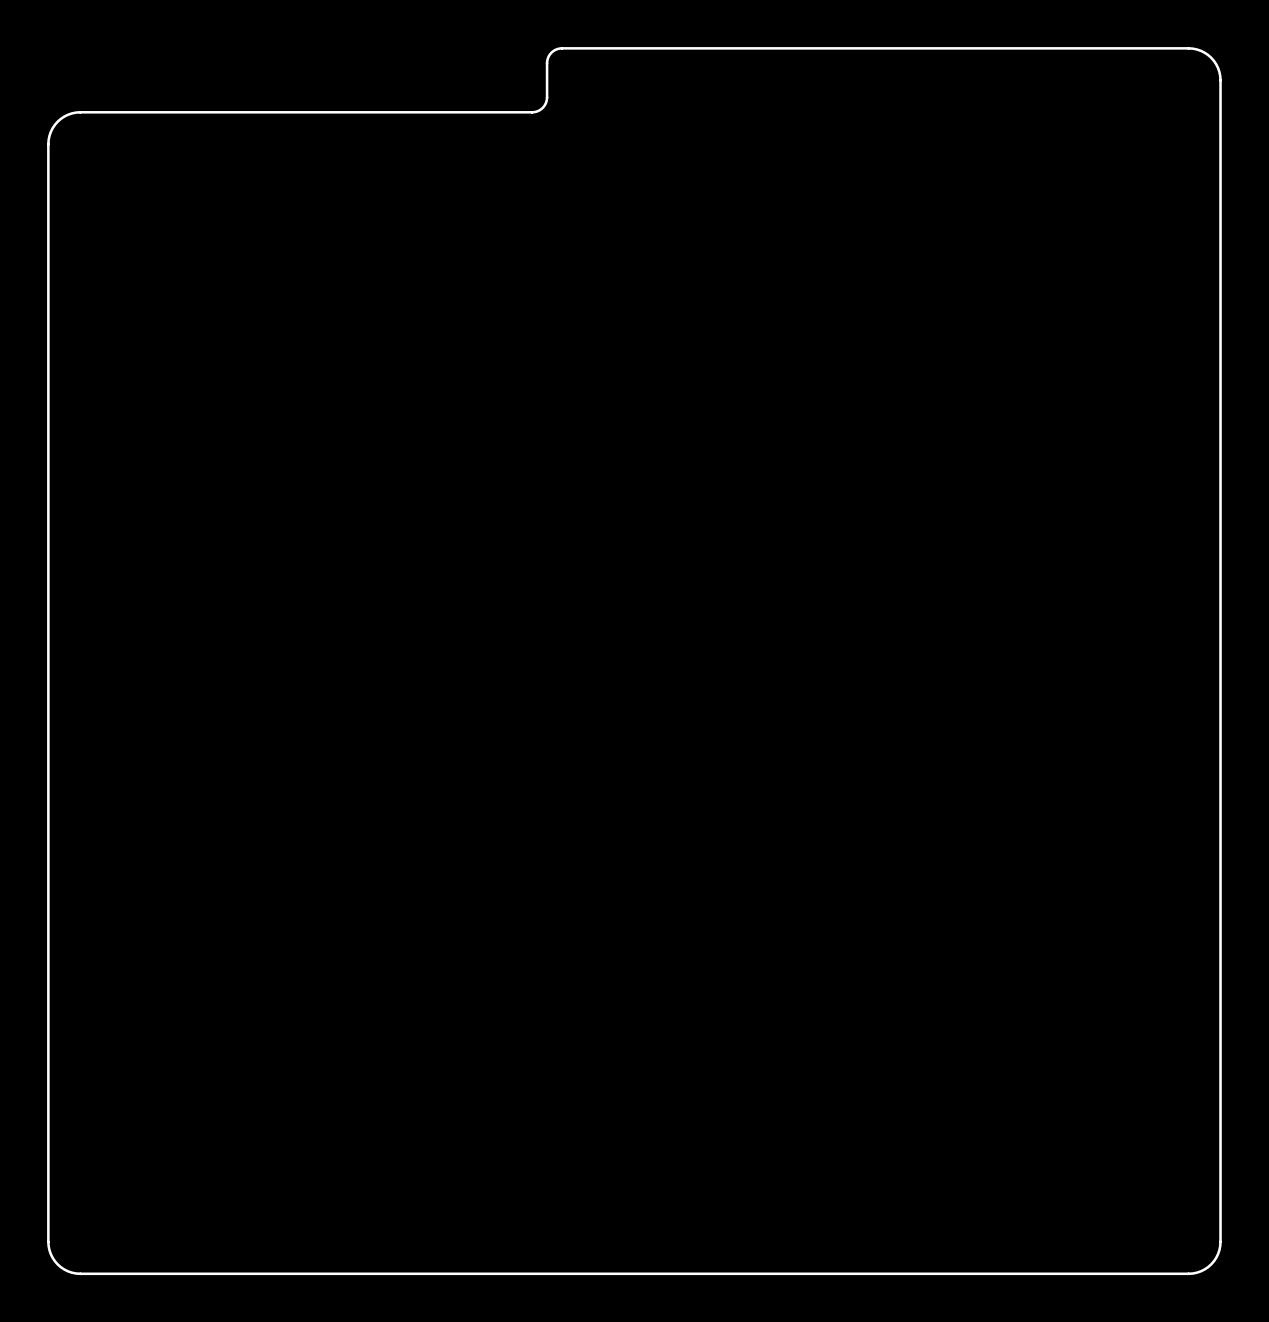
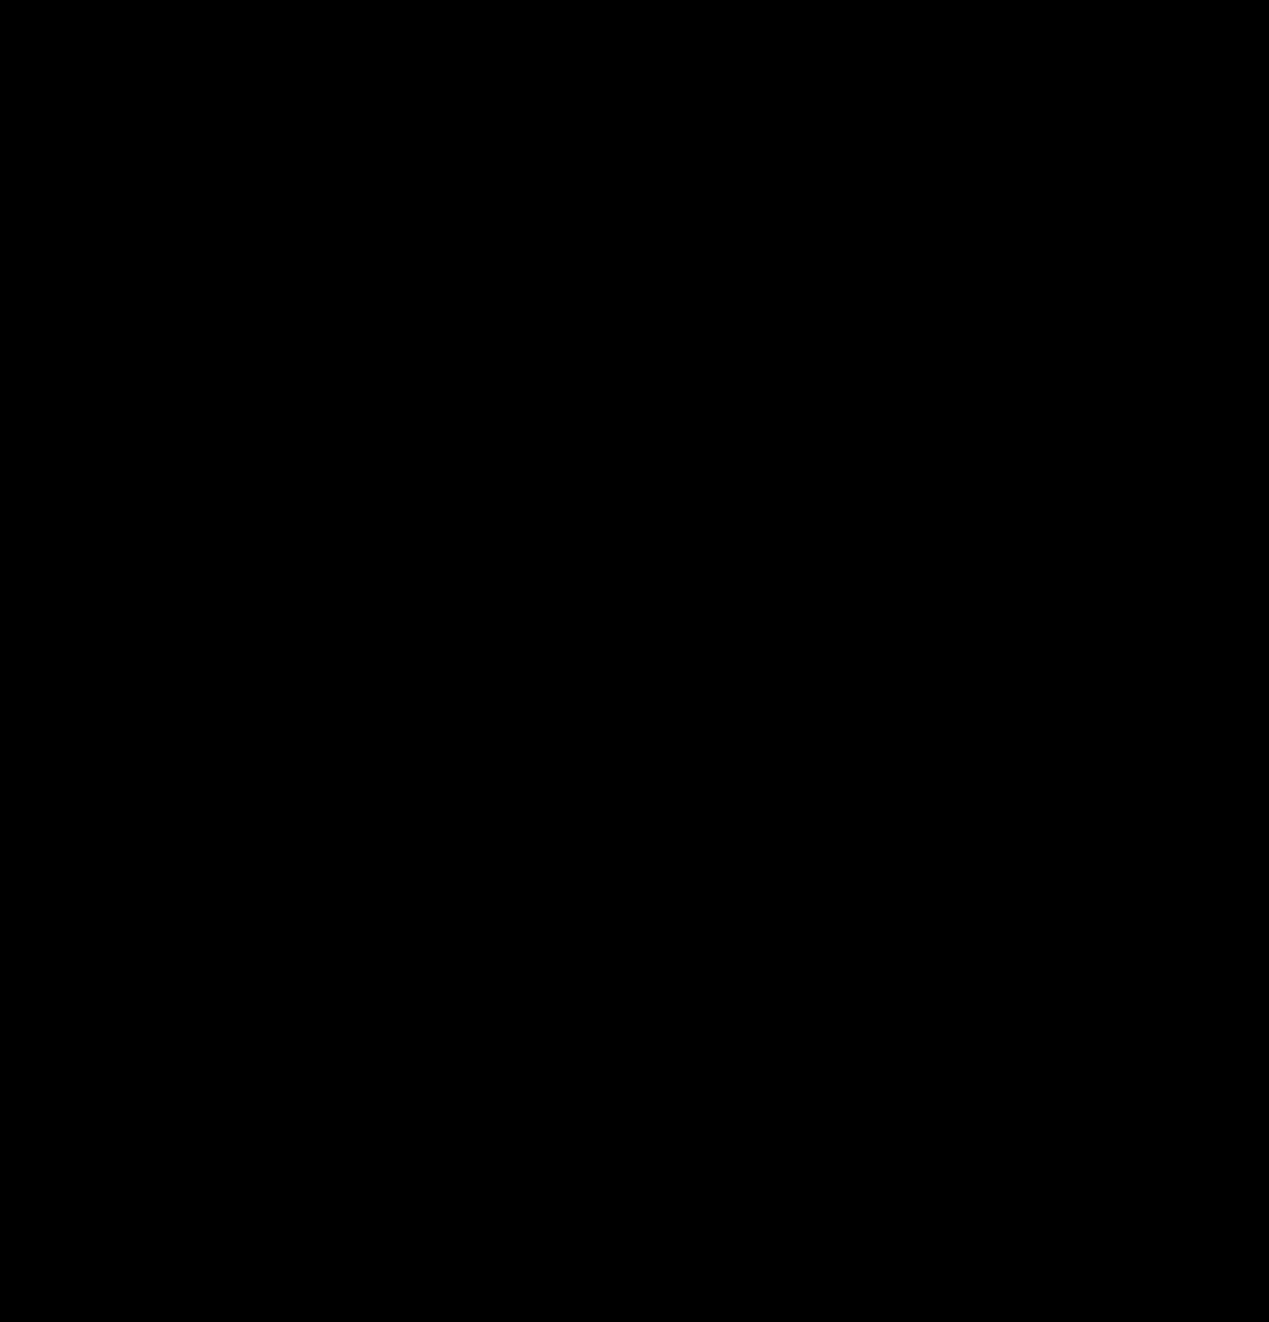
board edge: (561, 48) (1188, 48) (1204, 52) (1216, 64) (1220, 80) (1220, 1241) (1216, 1257) (1204, 1269) (1188, 1273) (80, 1273) (64, 1269) (52, 1257) (48, 1241) (48, 144) (50, 132) (54, 124) (64, 116) (80, 112) (534, 112) (541, 109) (546, 101) (548, 57) (552, 51) (561, 48) -> none

